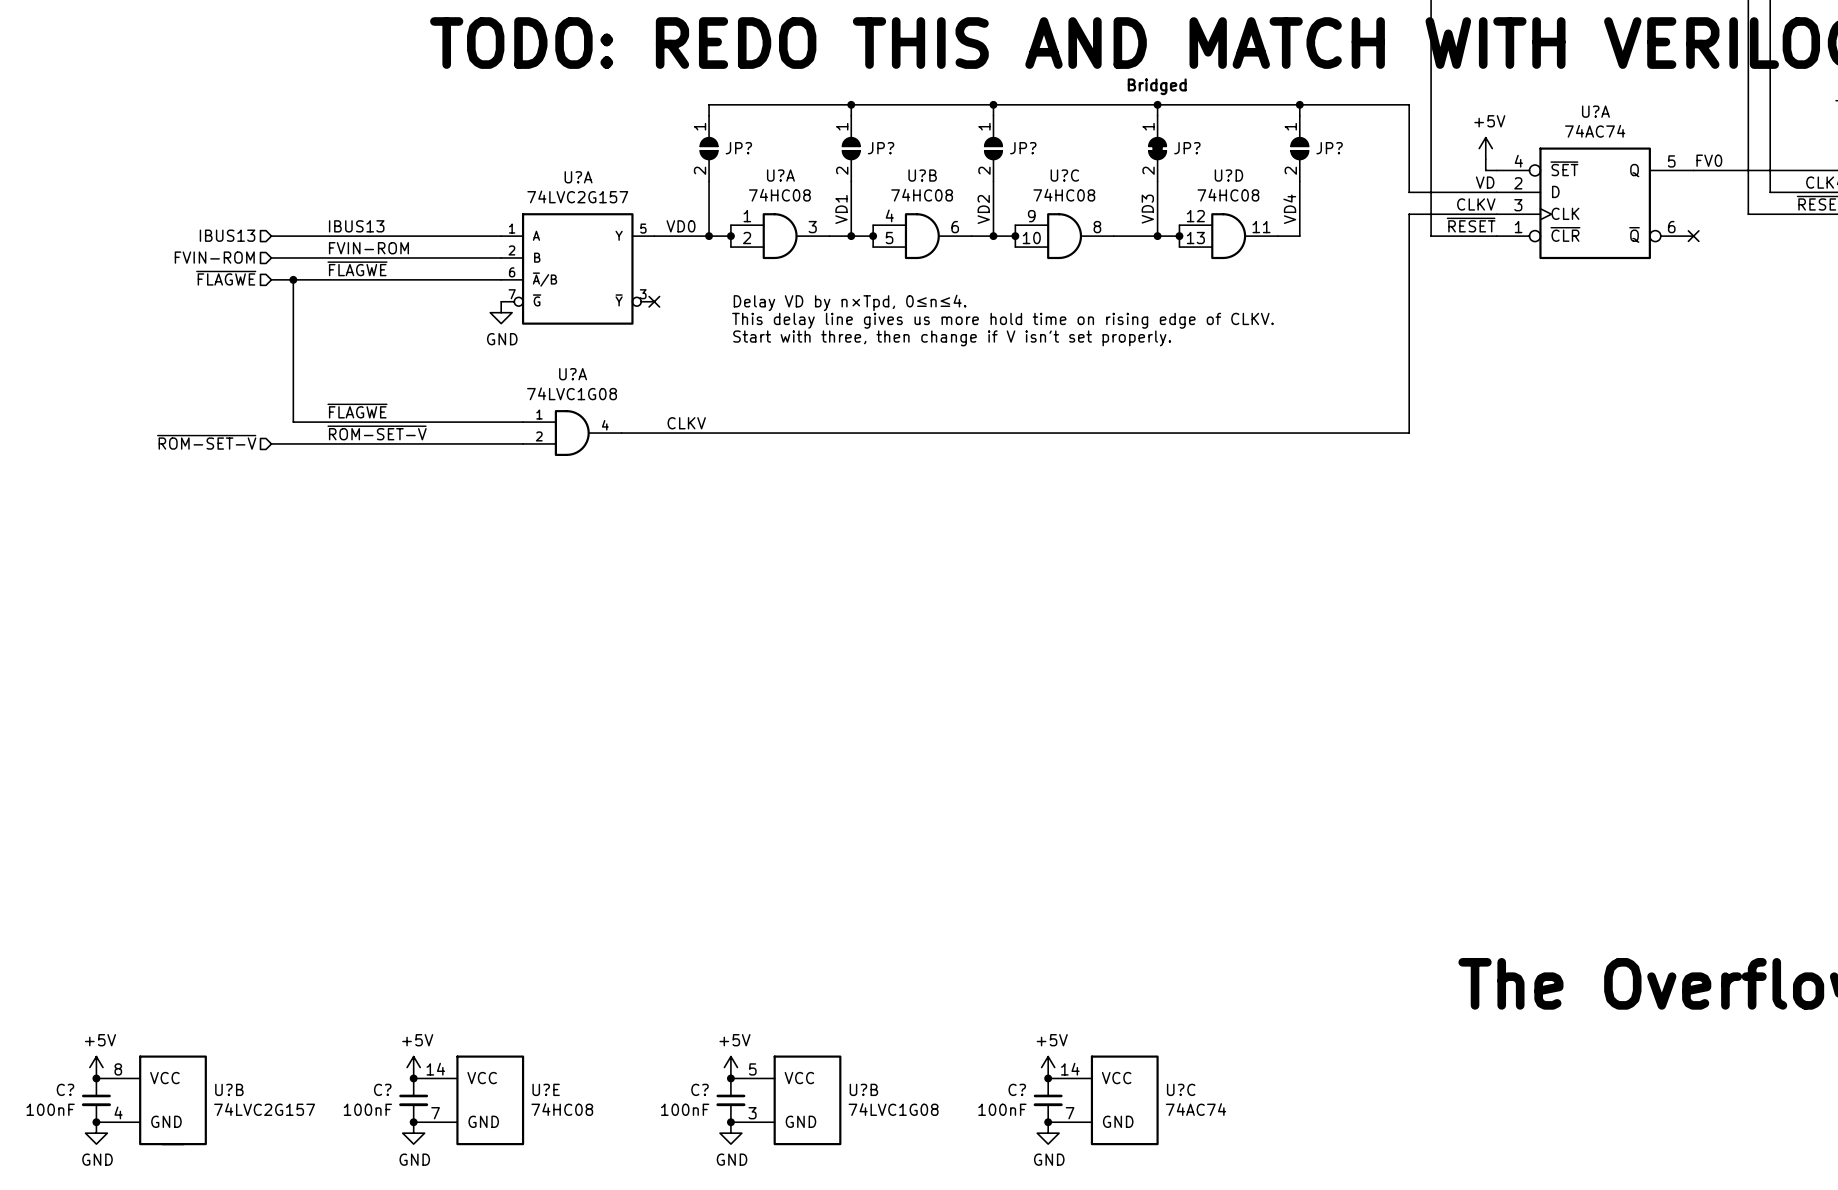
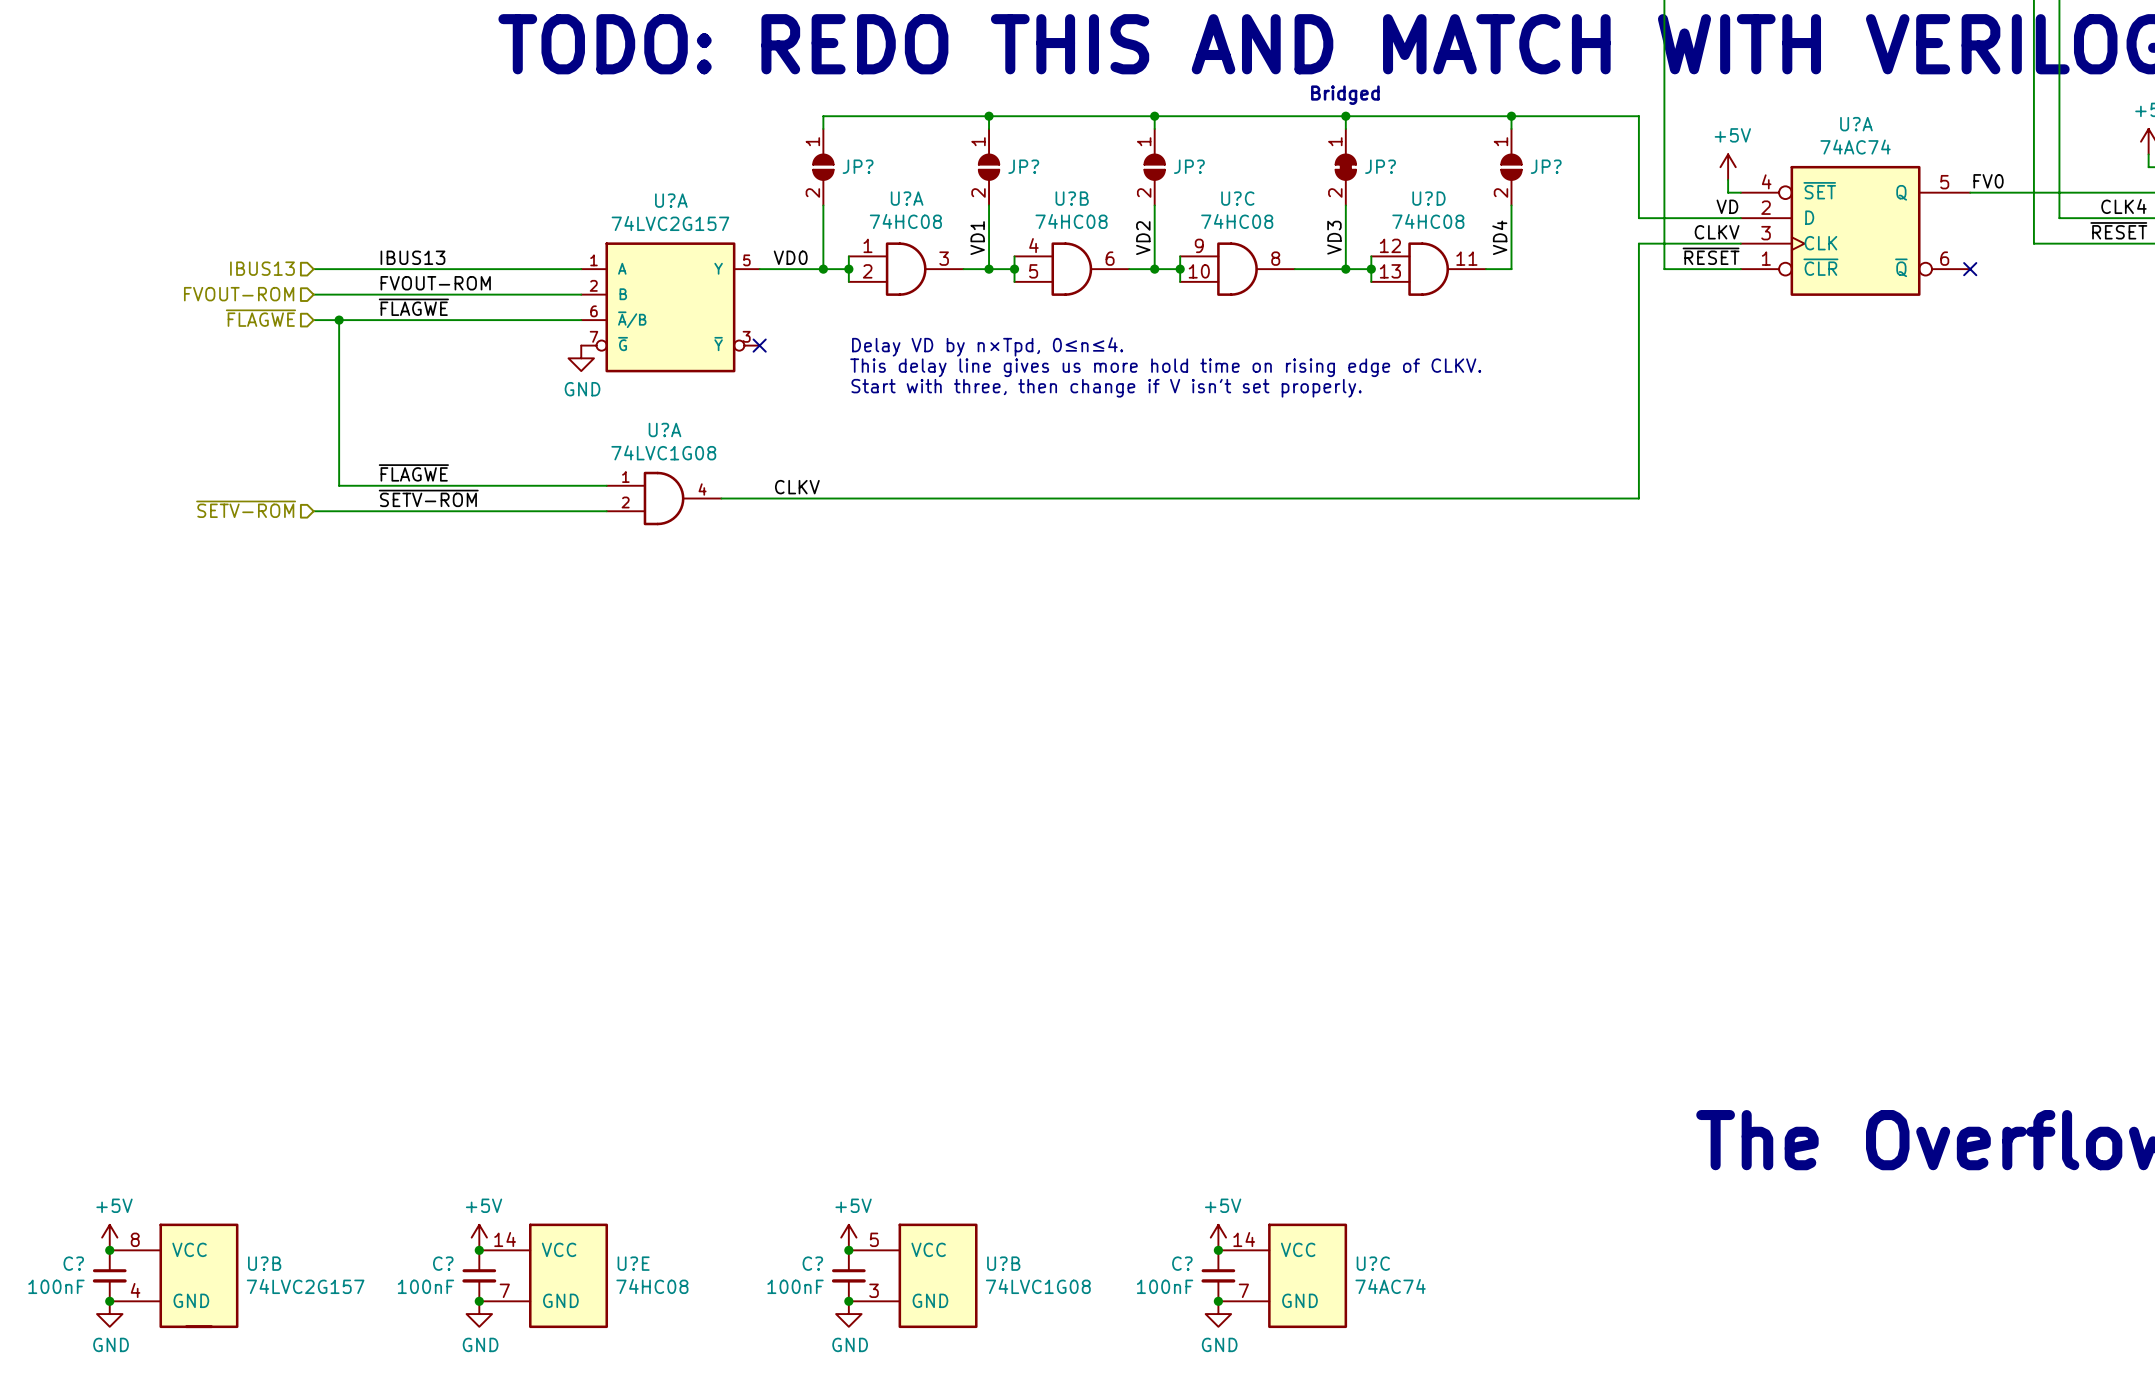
label: FVIN-ROM (368, 248) -> FVOUT-ROM (435, 283)
hierarchical label: FVIN-ROM (214, 257) -> FVOUT-ROM (239, 294)
label: ~{ROM-SET-V} (377, 432) -> ~{SETV-ROM} (428, 498)
hierarchical label: ~{ROM-SET-V} (206, 442) -> ~{SETV-ROM} (246, 509)

